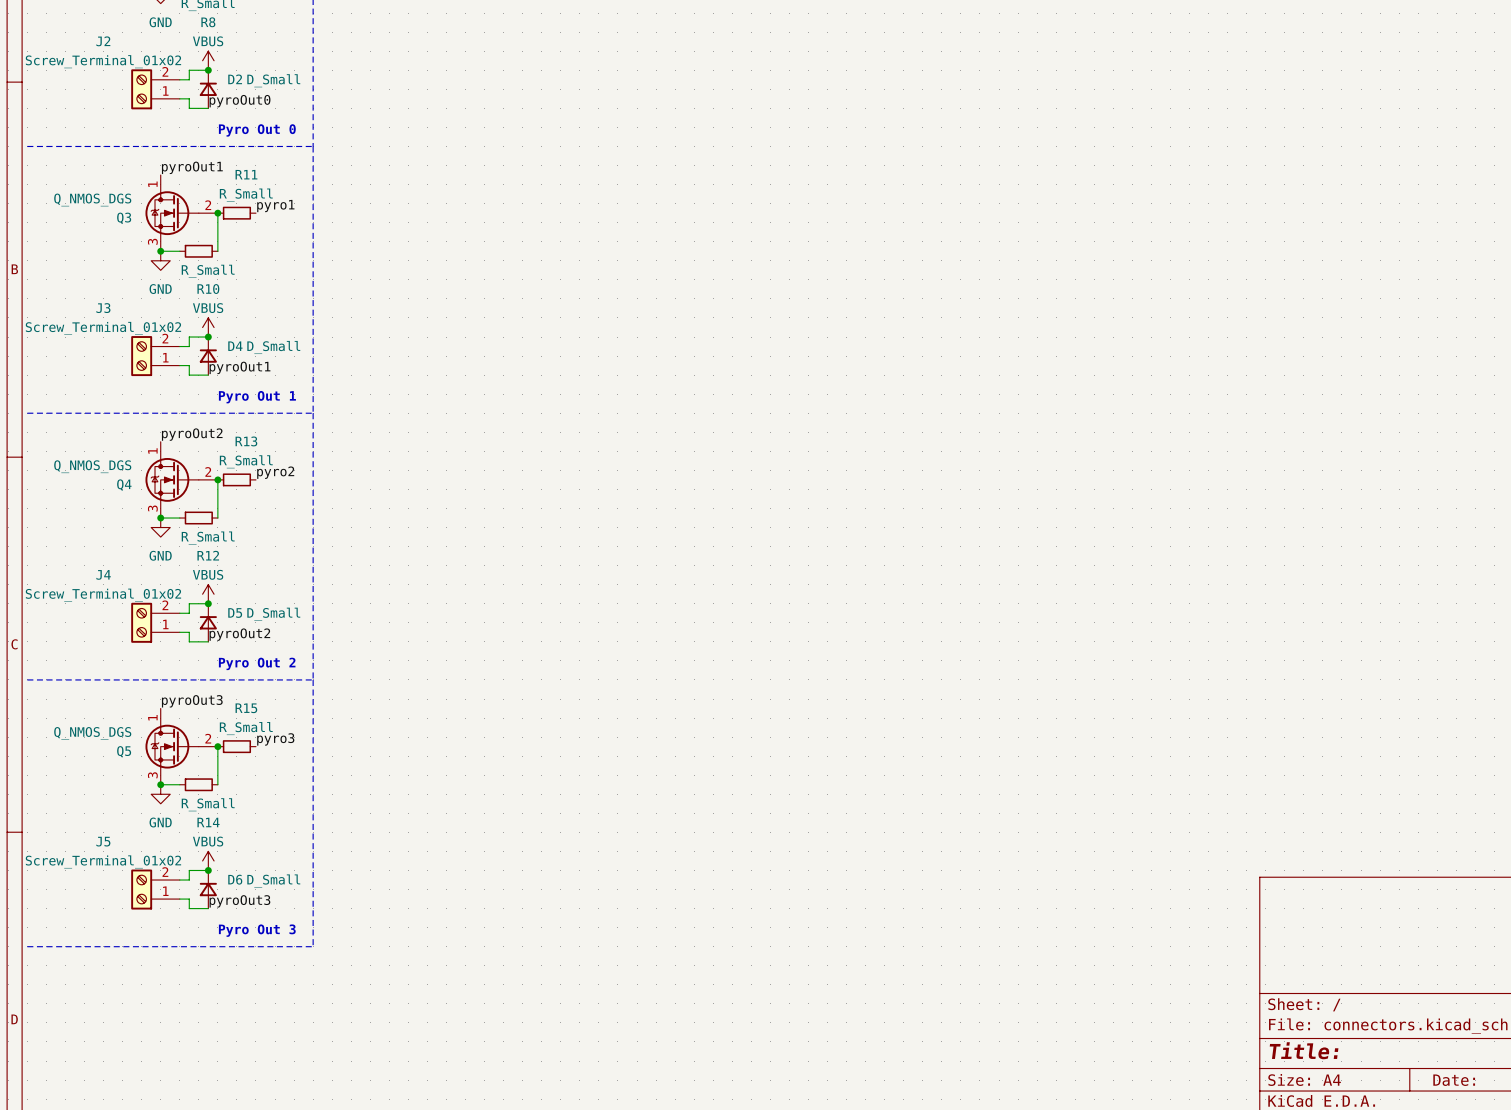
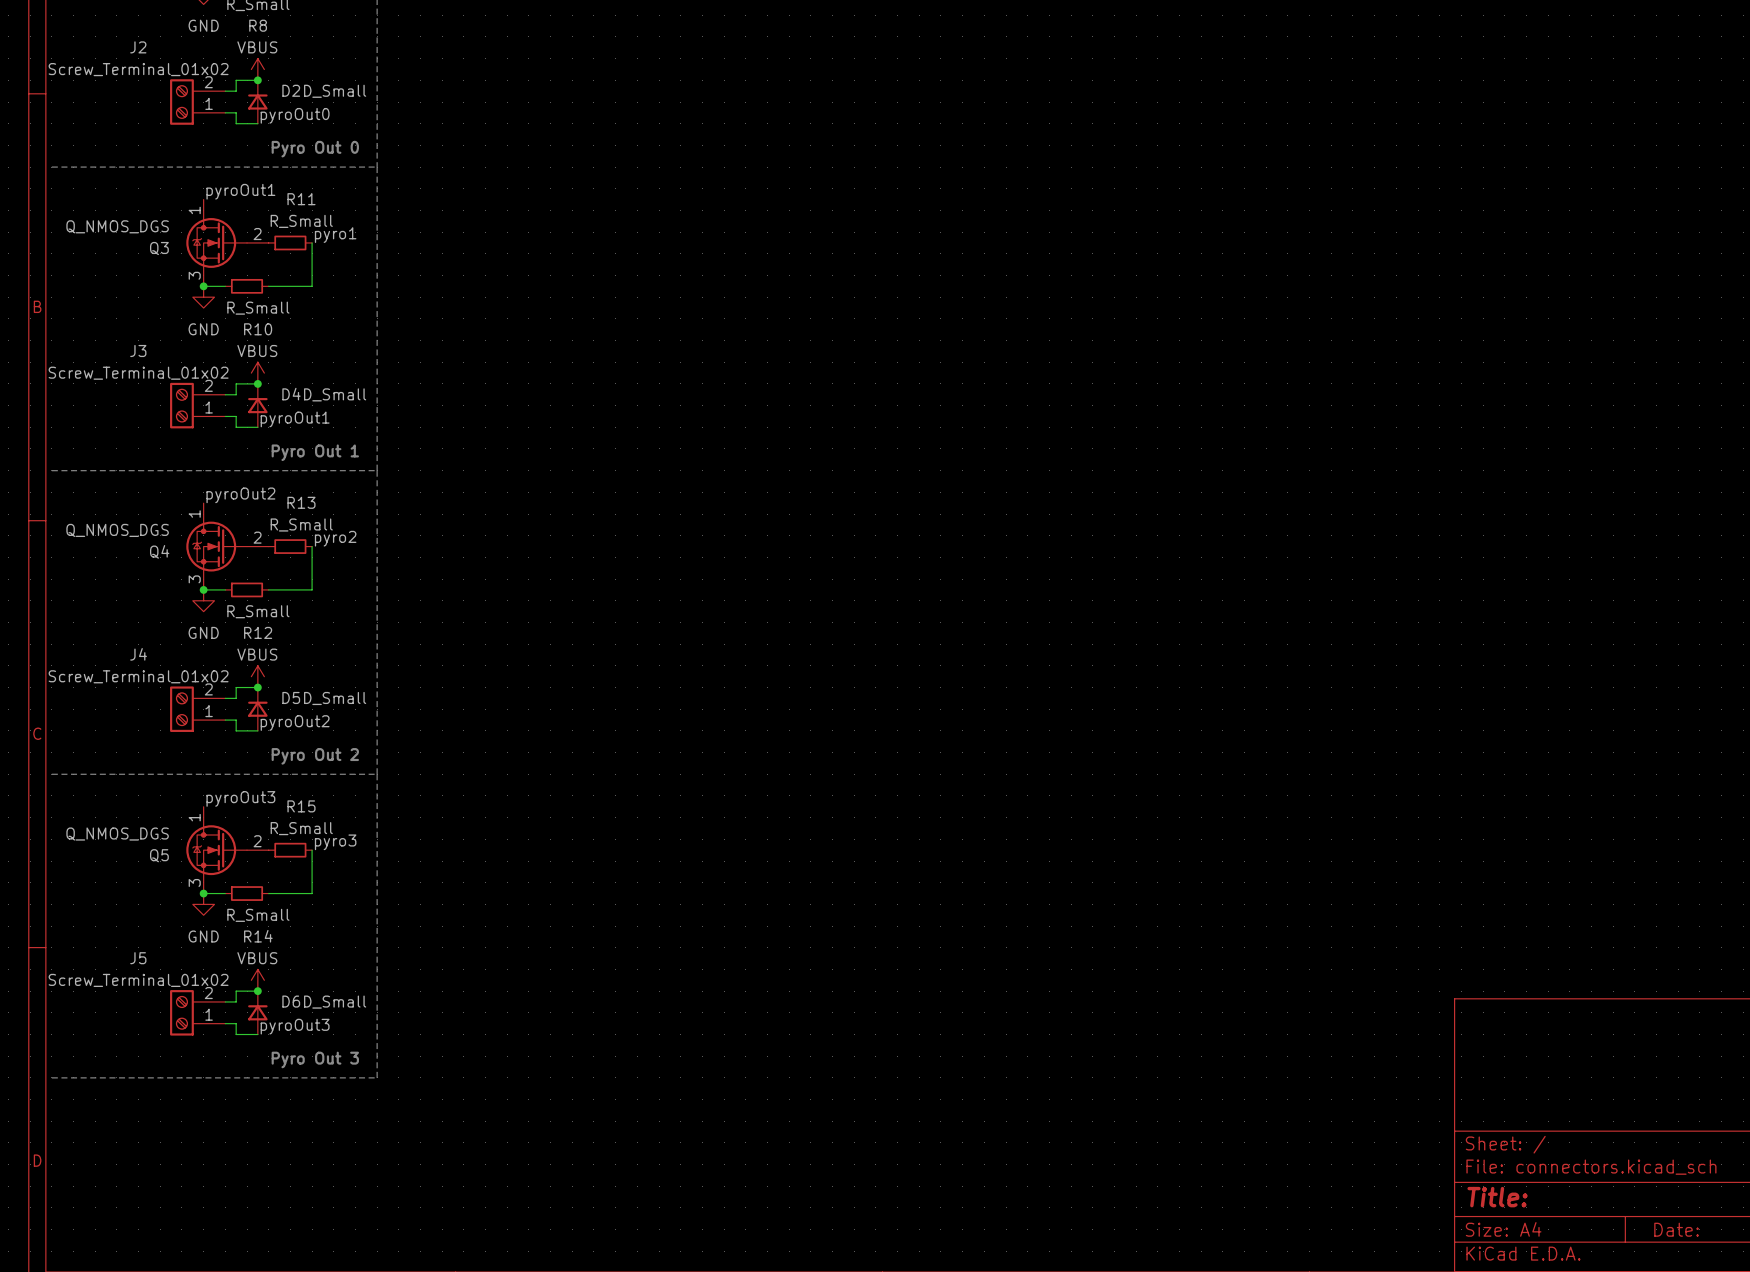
wire: (217, 213) (217, 251) -> (312, 242) (312, 286) (268, 286)
junction: (217, 213) -> none
wire: (217, 479) (217, 518) -> (312, 546) (312, 589) (268, 589)
junction: (217, 479) -> none
wire: (217, 746) (217, 784) -> (312, 850) (312, 893) (268, 893)
junction: (217, 746) -> none

